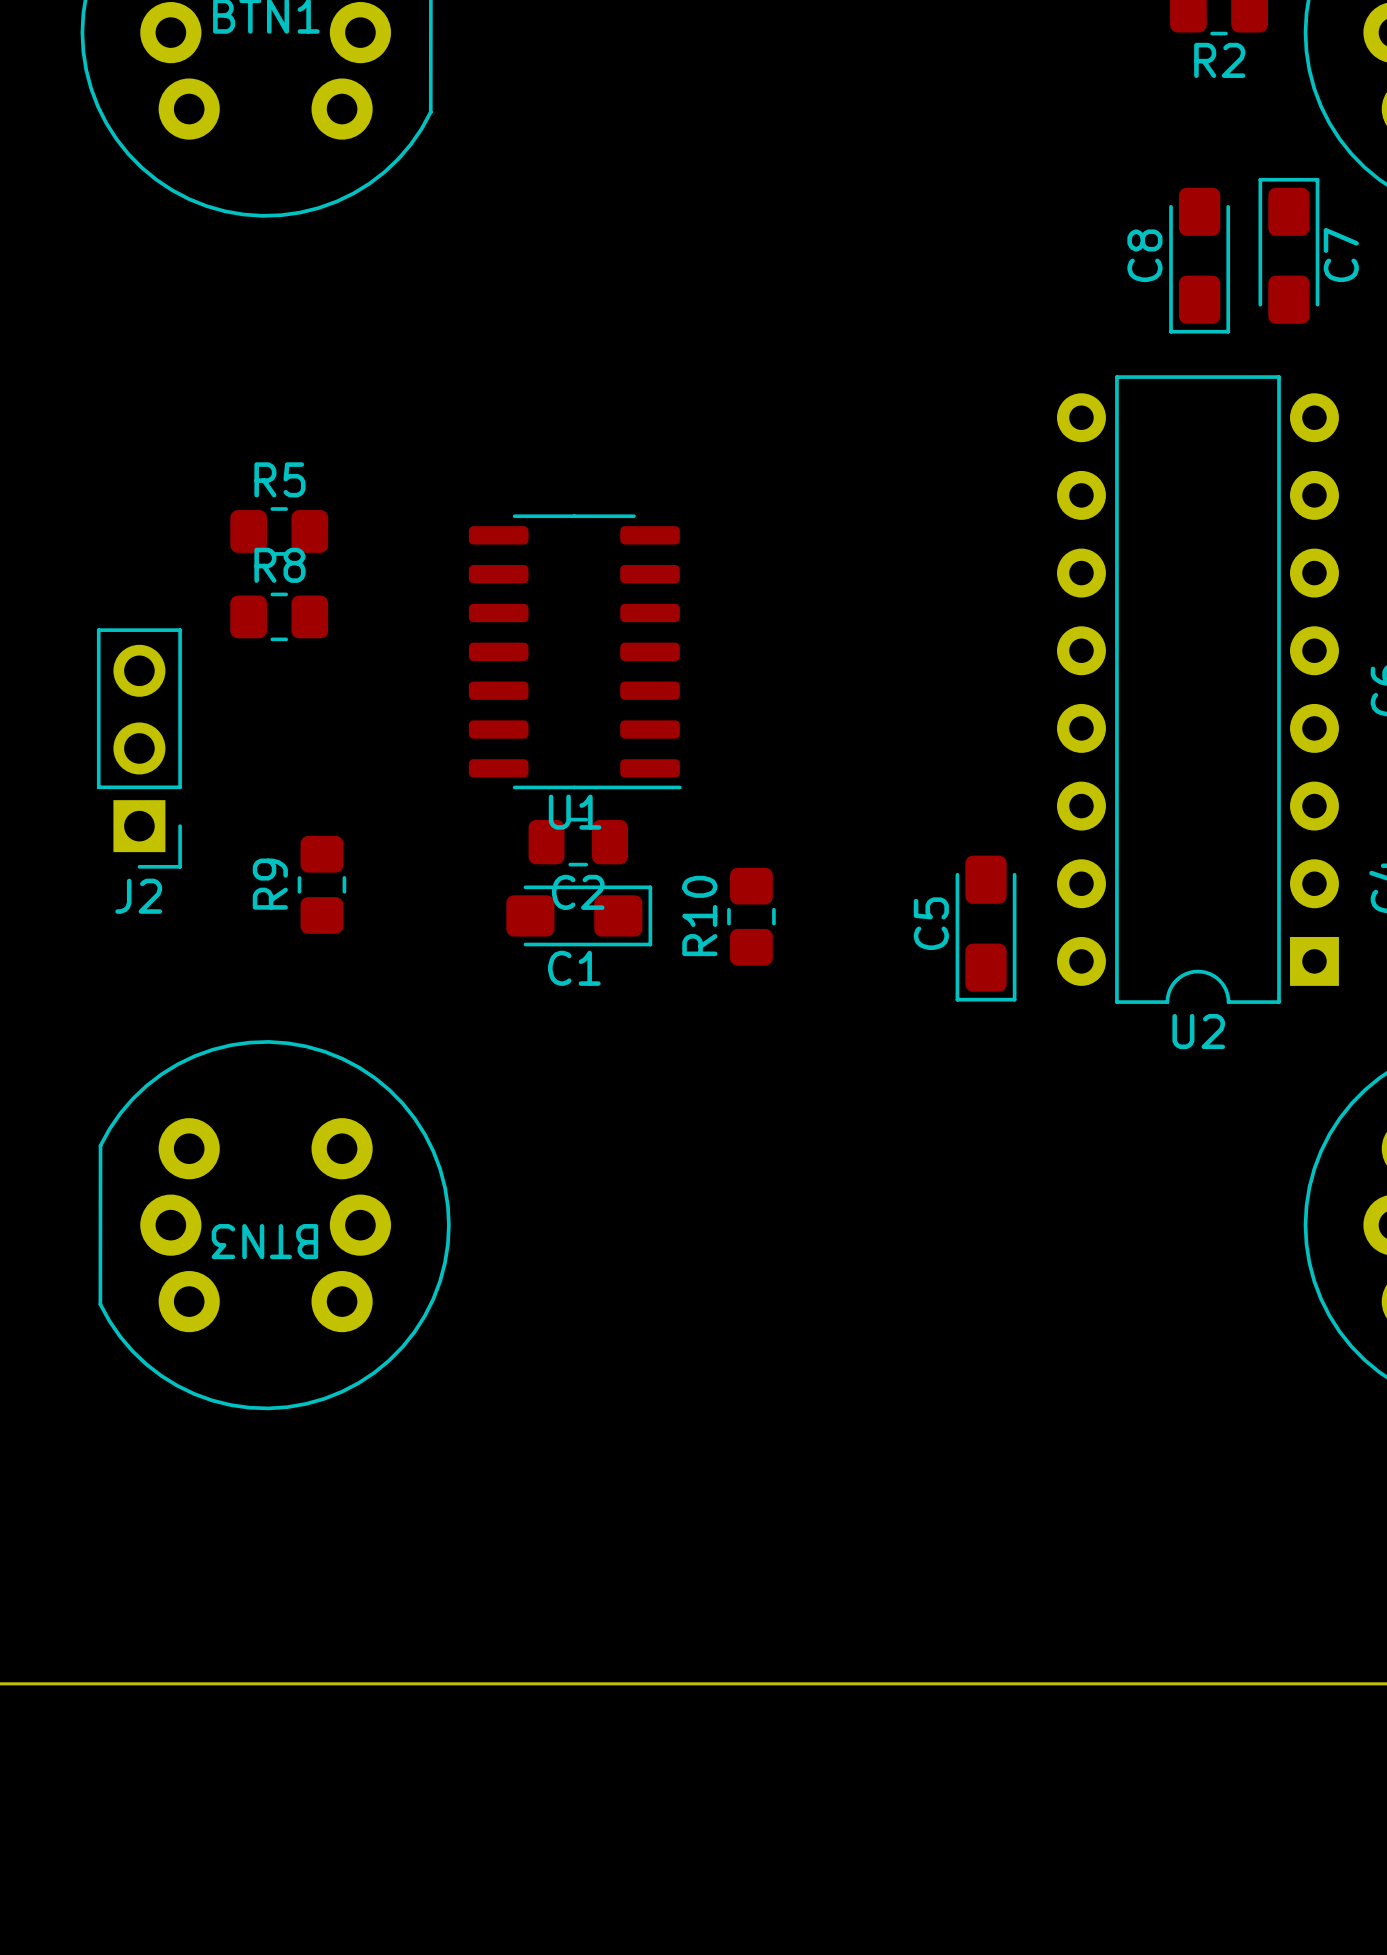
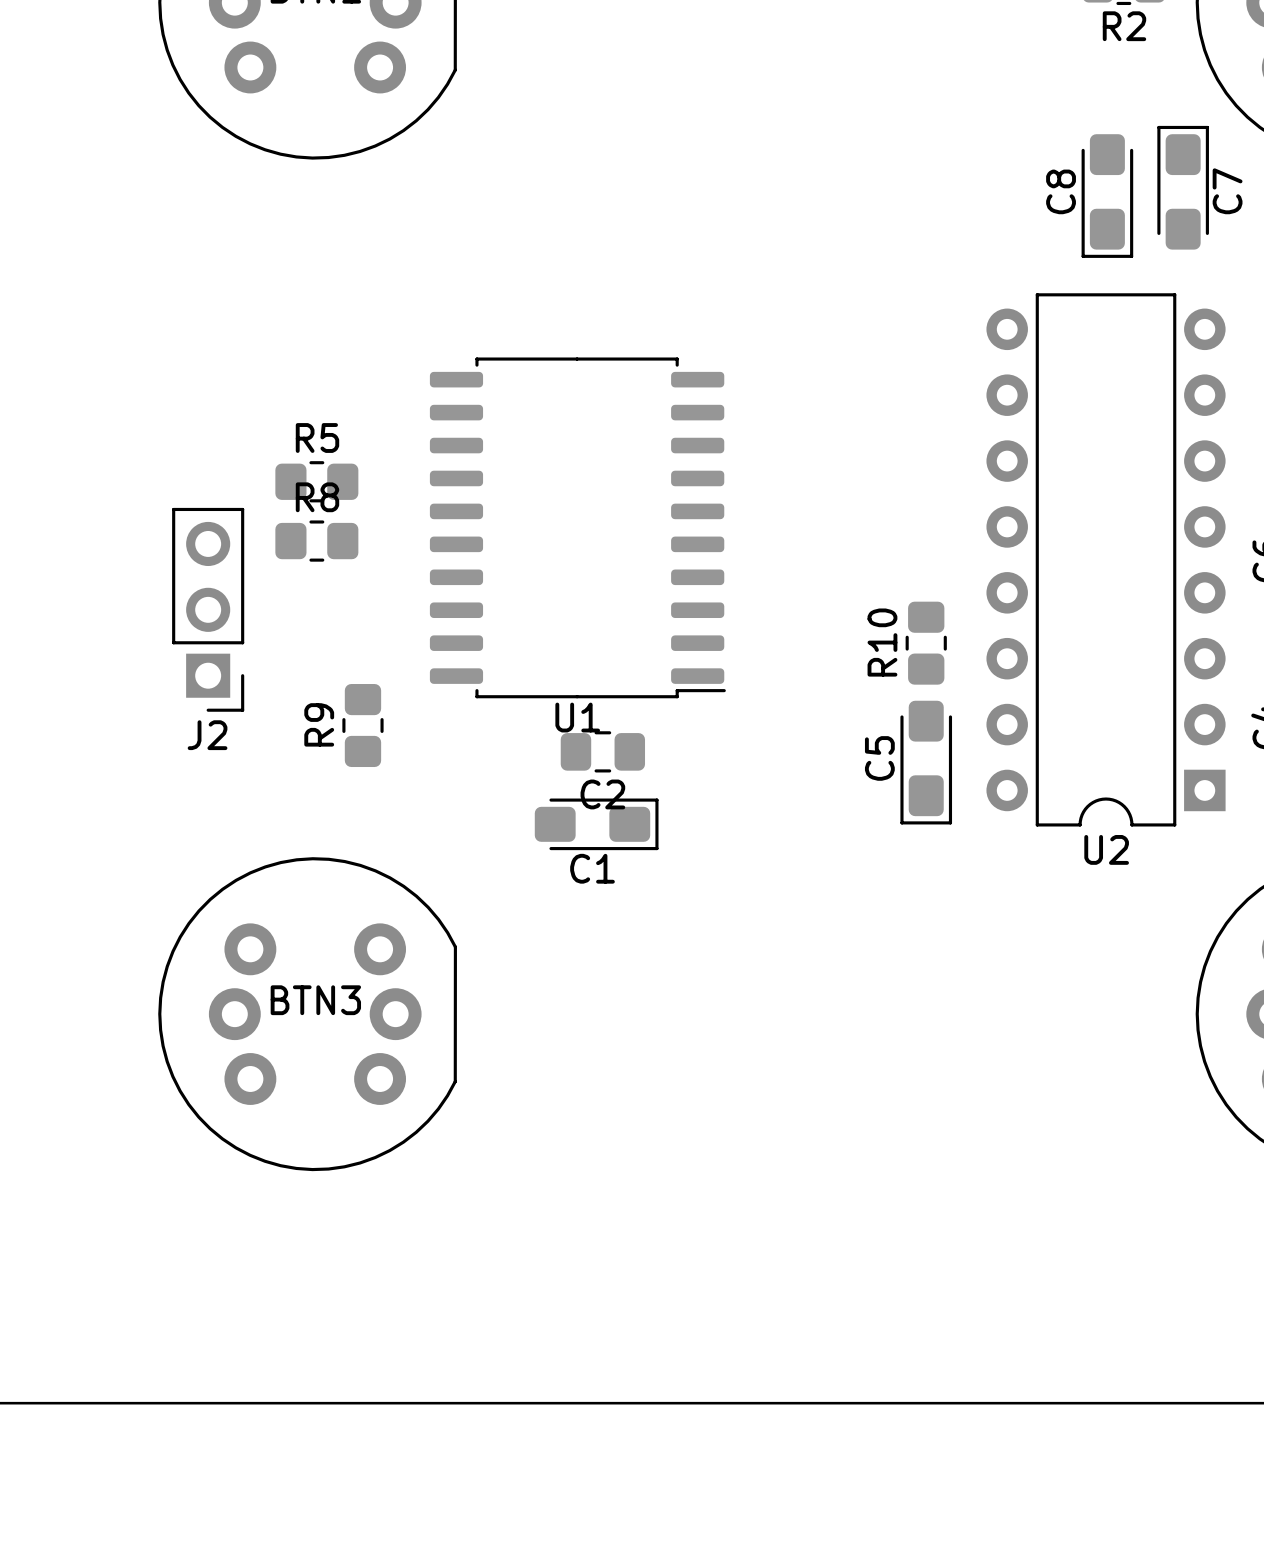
U1 footprint: [468, 514, 682, 790] -> [429, 357, 726, 699]
R5 position: (279, 531) -> (316, 481)
R8 position: (279, 616) -> (316, 541)
U1 name position: U1 (575, 812) -> U1 (577, 717)
C2 position: (578, 842) -> (602, 751)
C1 position: (579, 915) -> (596, 824)
R10 position: (751, 916) -> (926, 643)
BTN3 rotation: 0° (274, 1225) -> 180° (307, 1014)

